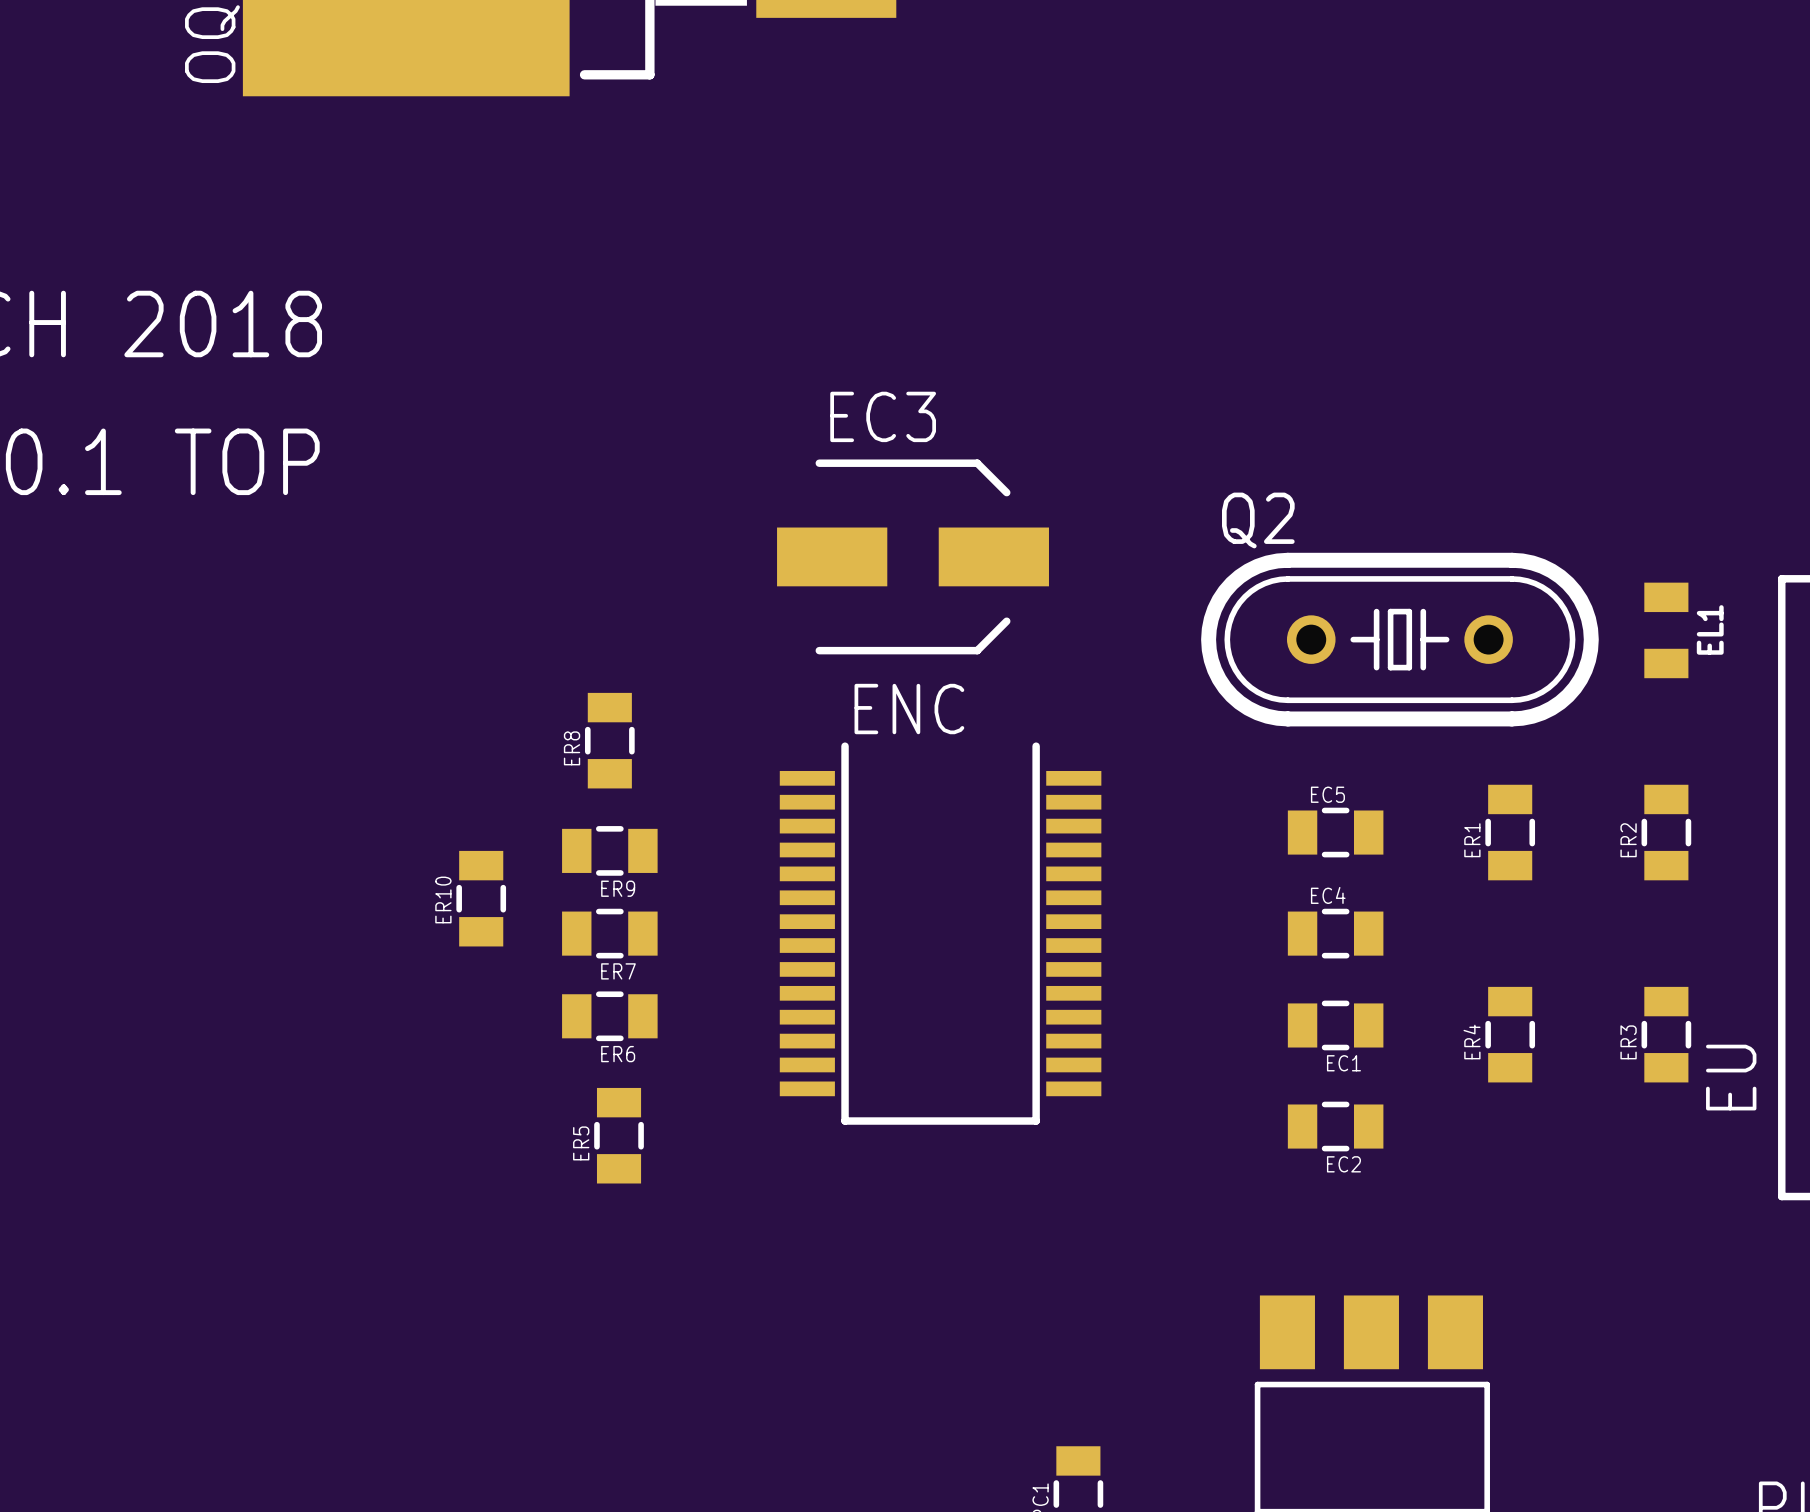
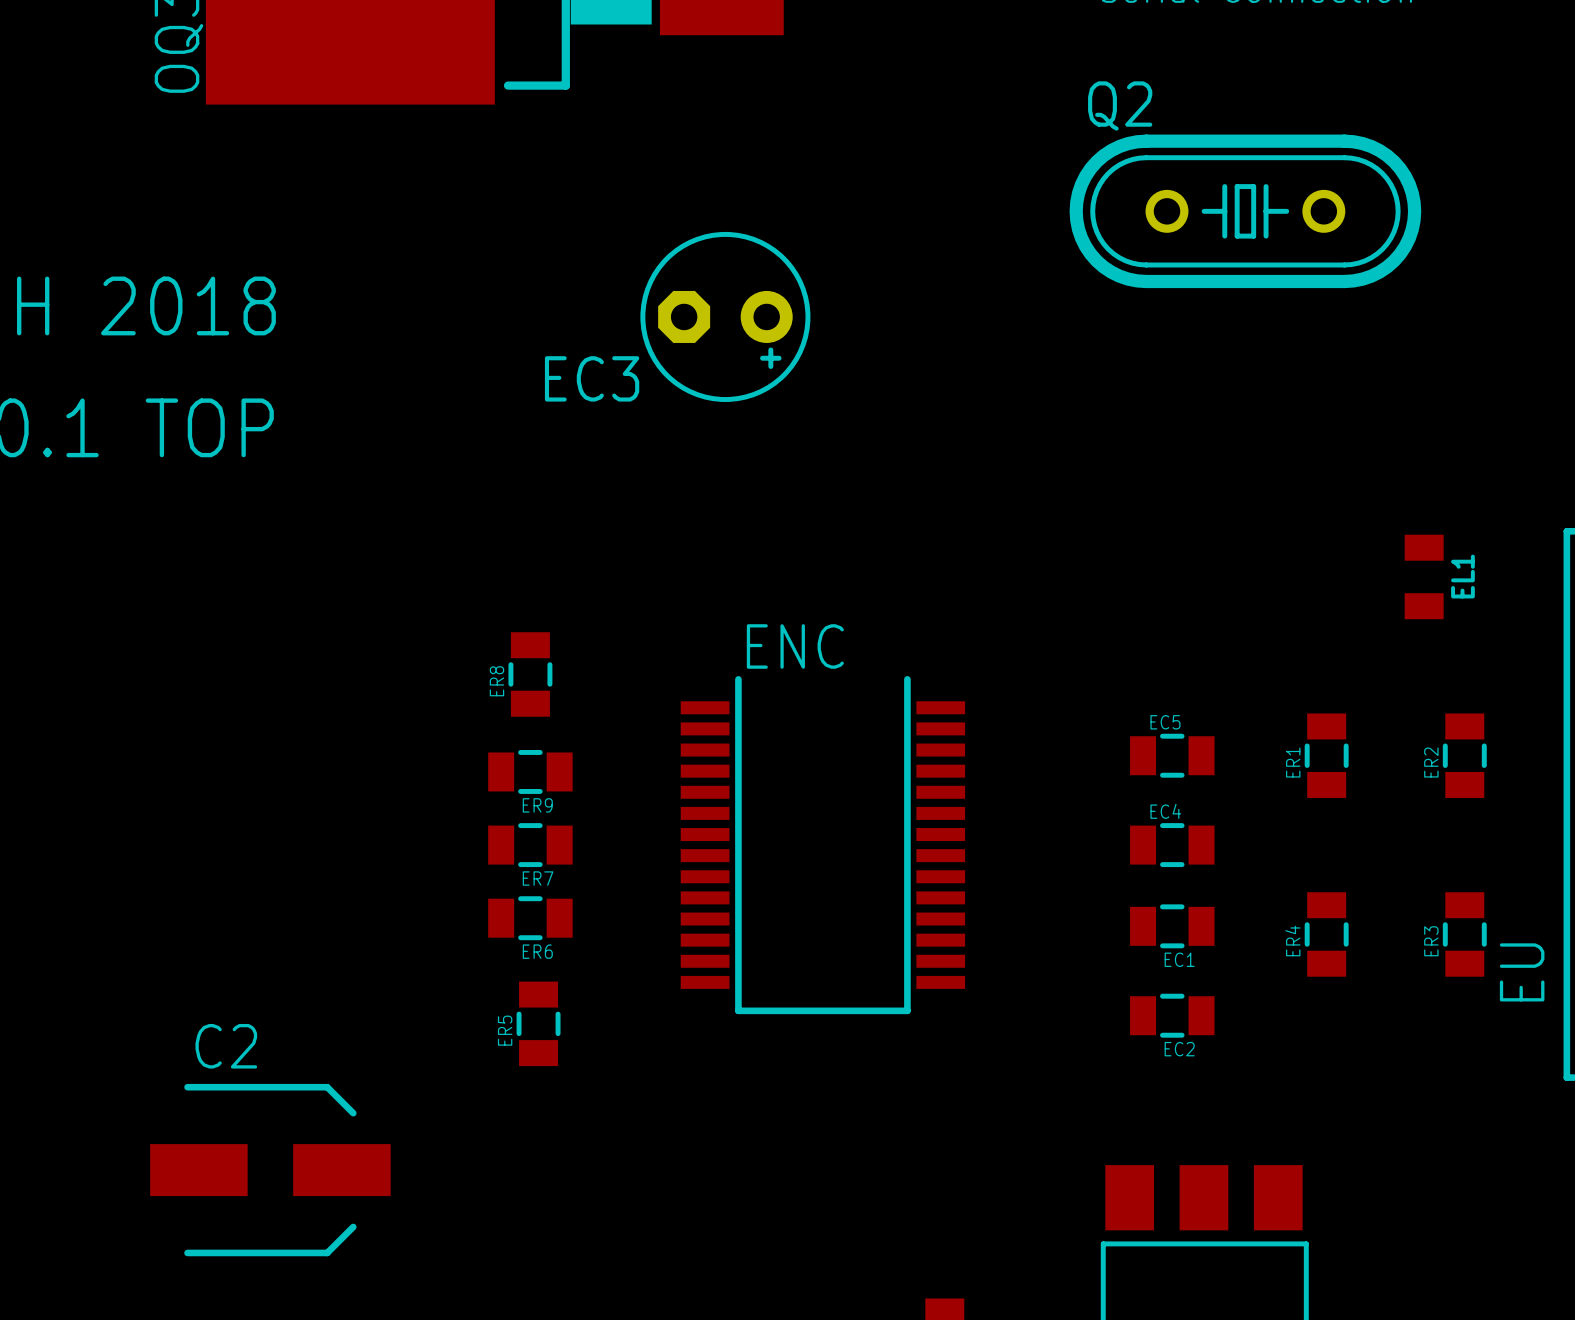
EC3 name position: EC3 (883, 416) -> EC3 (592, 378)
EC3 footprint: [777, 459, 1049, 655] -> [640, 231, 811, 402]
EL1 position: (1666, 630) -> (1424, 576)
Q2 position: (1399, 639) -> (1245, 211)
ER10: (481, 898) -> none
C2: none -> (270, 1170)

